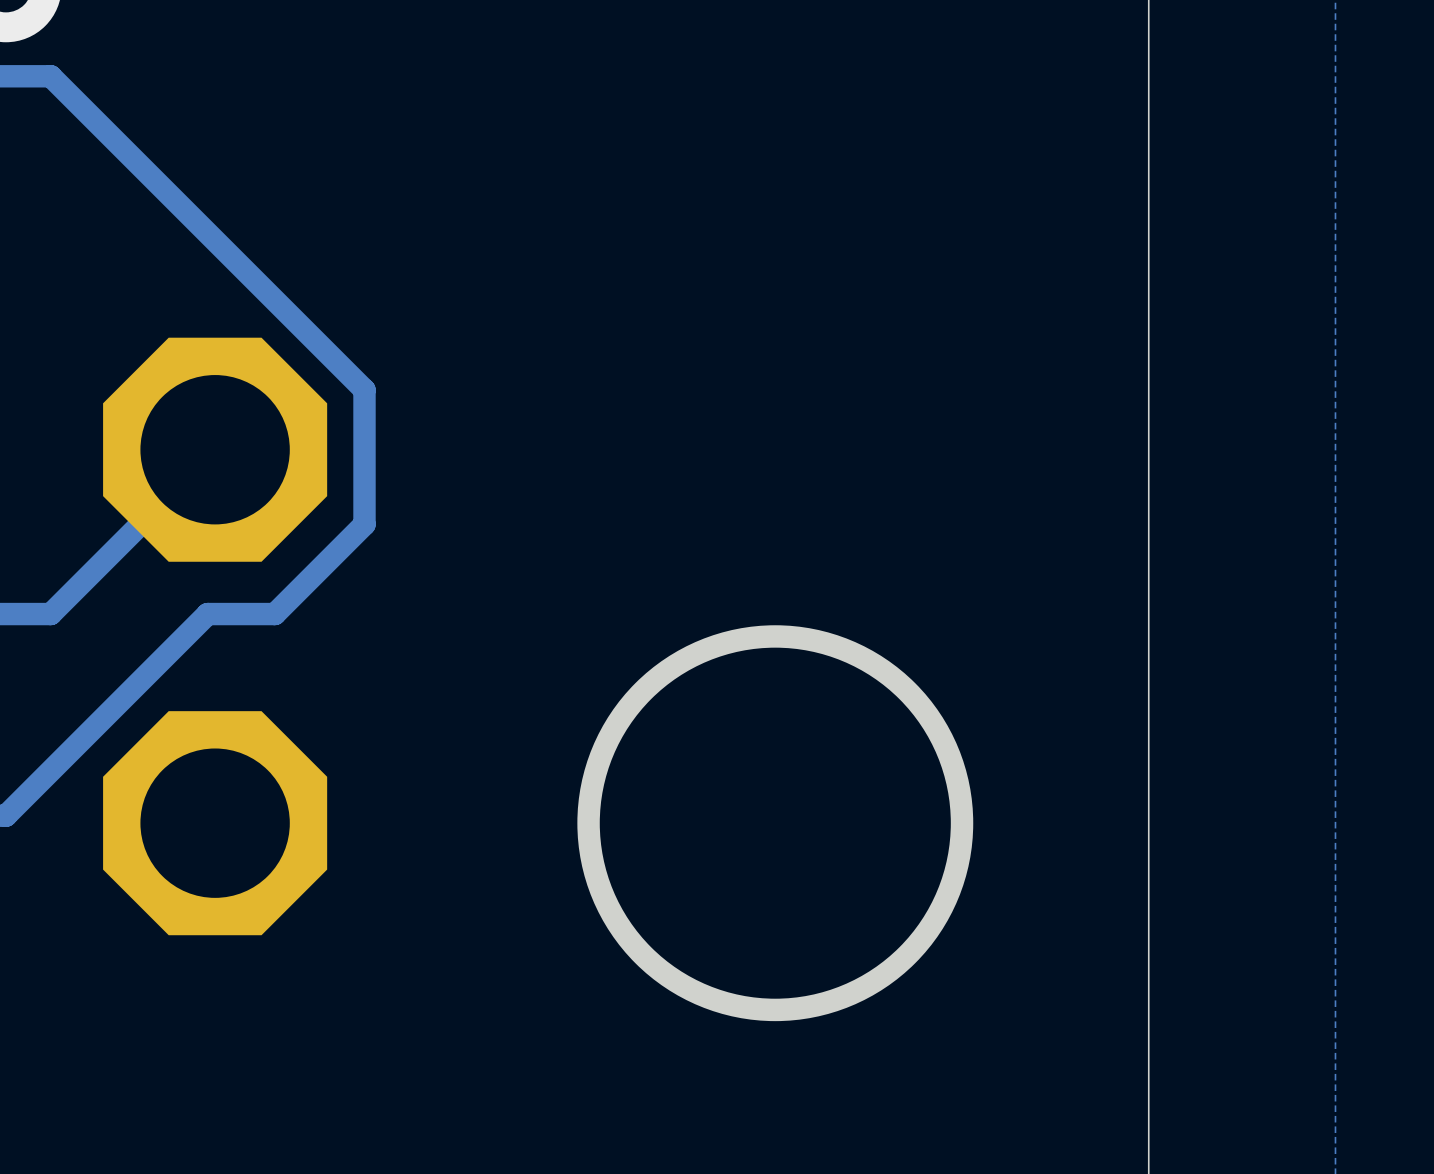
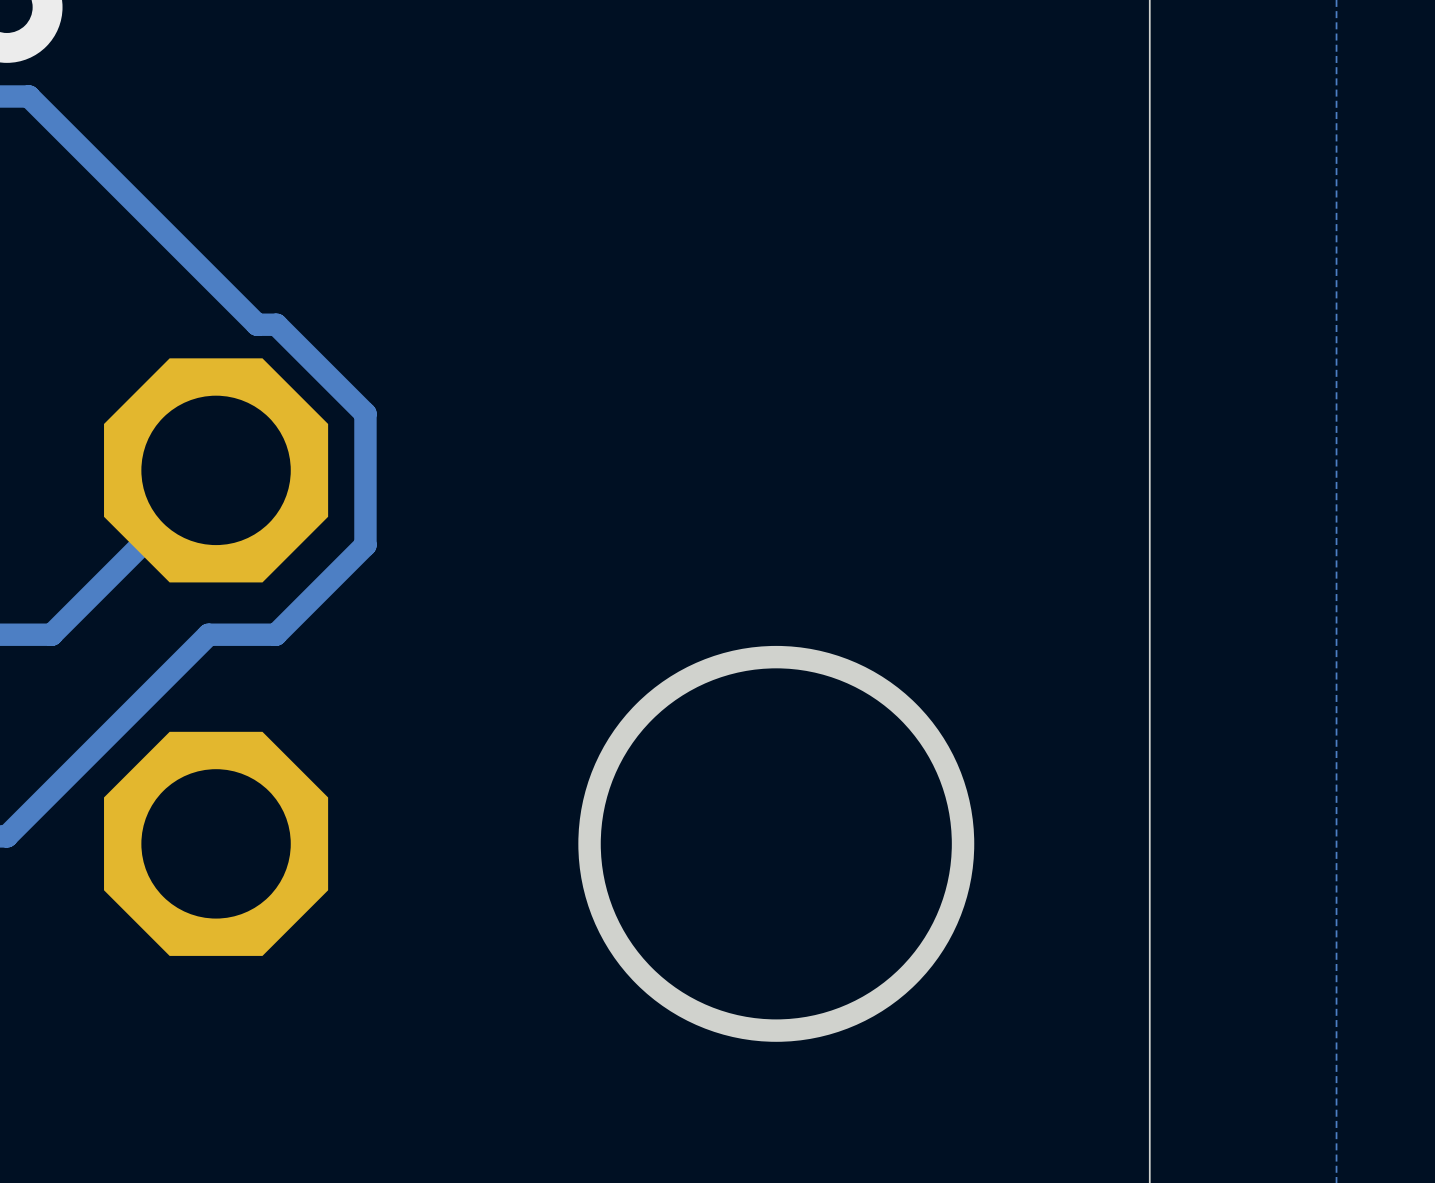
track: (27, 75) (50, 76) (364, 389) (364, 393) -> (28, 96) (257, 324) (276, 324) (365, 413)

